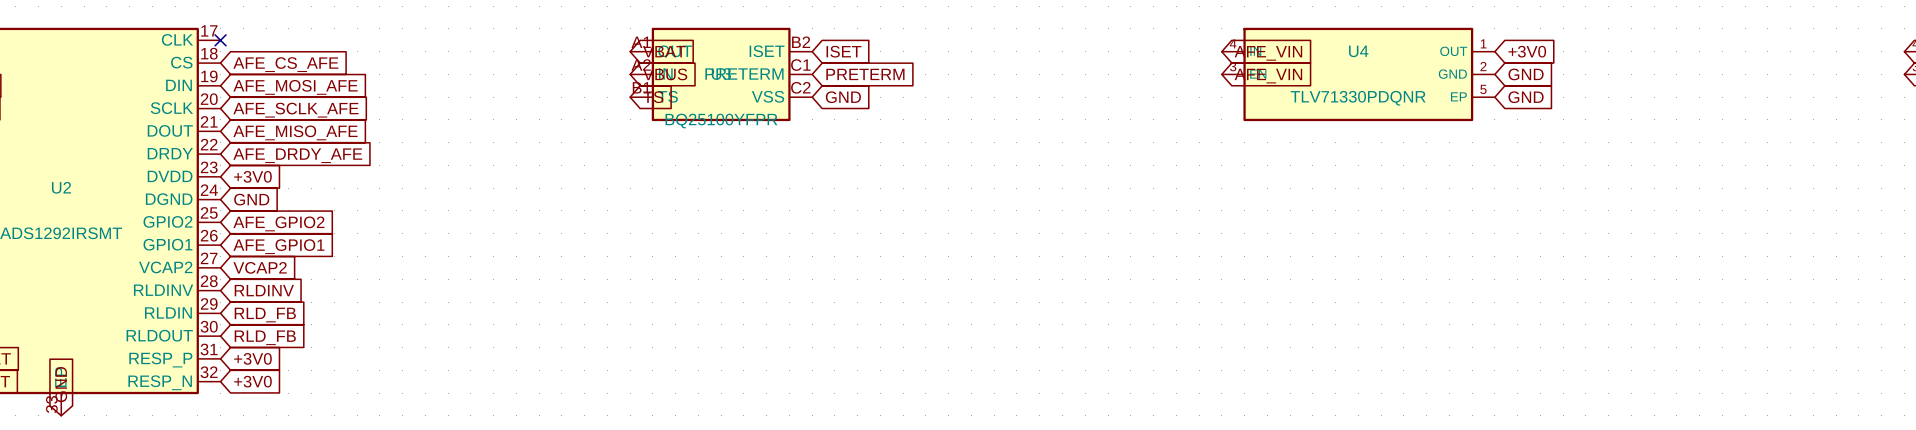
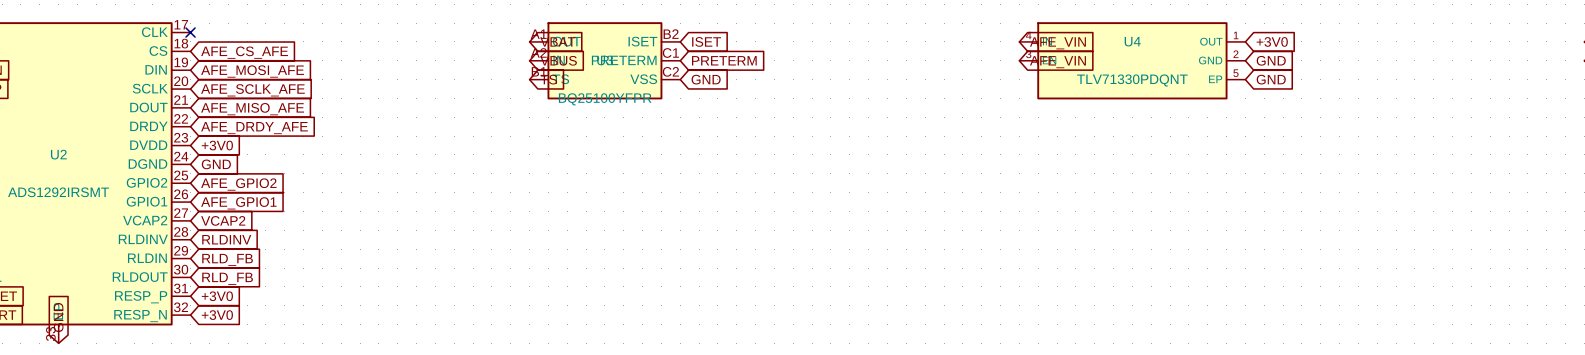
U4 value: TLV71330PDQNR (1358, 98) -> TLV71330PDQNT (1132, 80)

